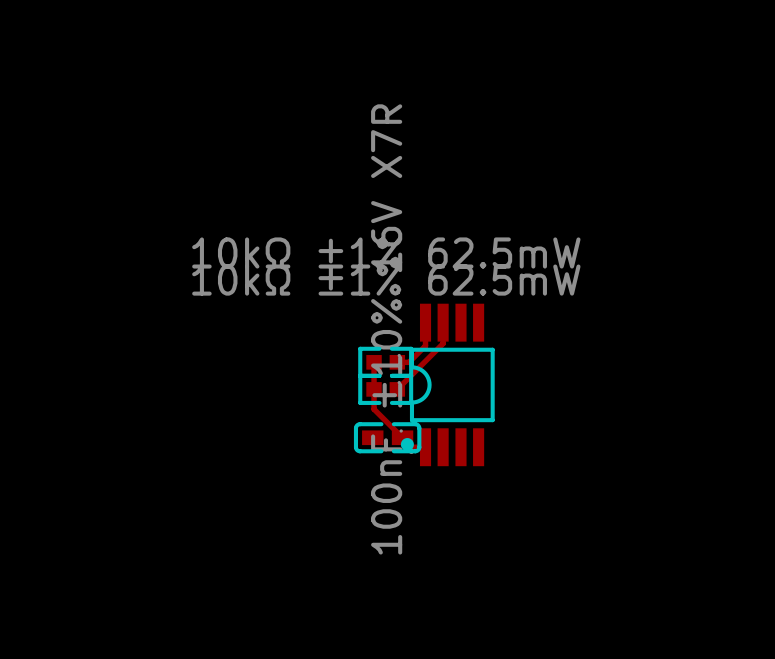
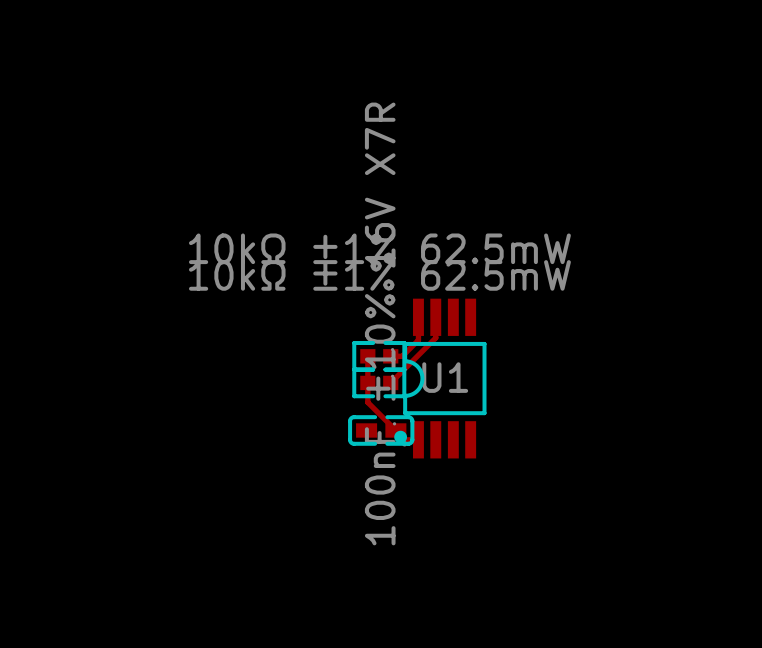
U1 name: none -> U1 (445, 377)

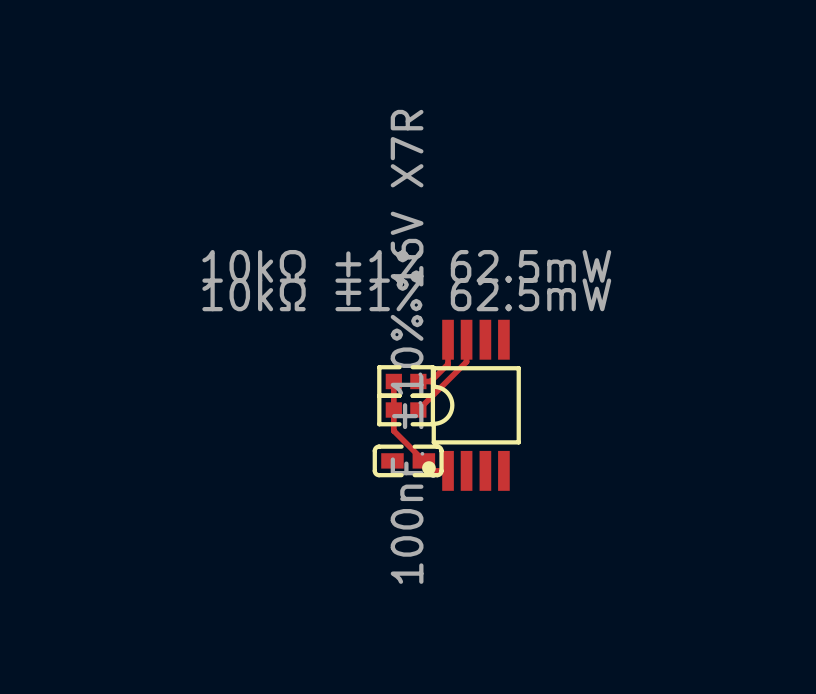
U1 name: U1 (445, 377) -> none

